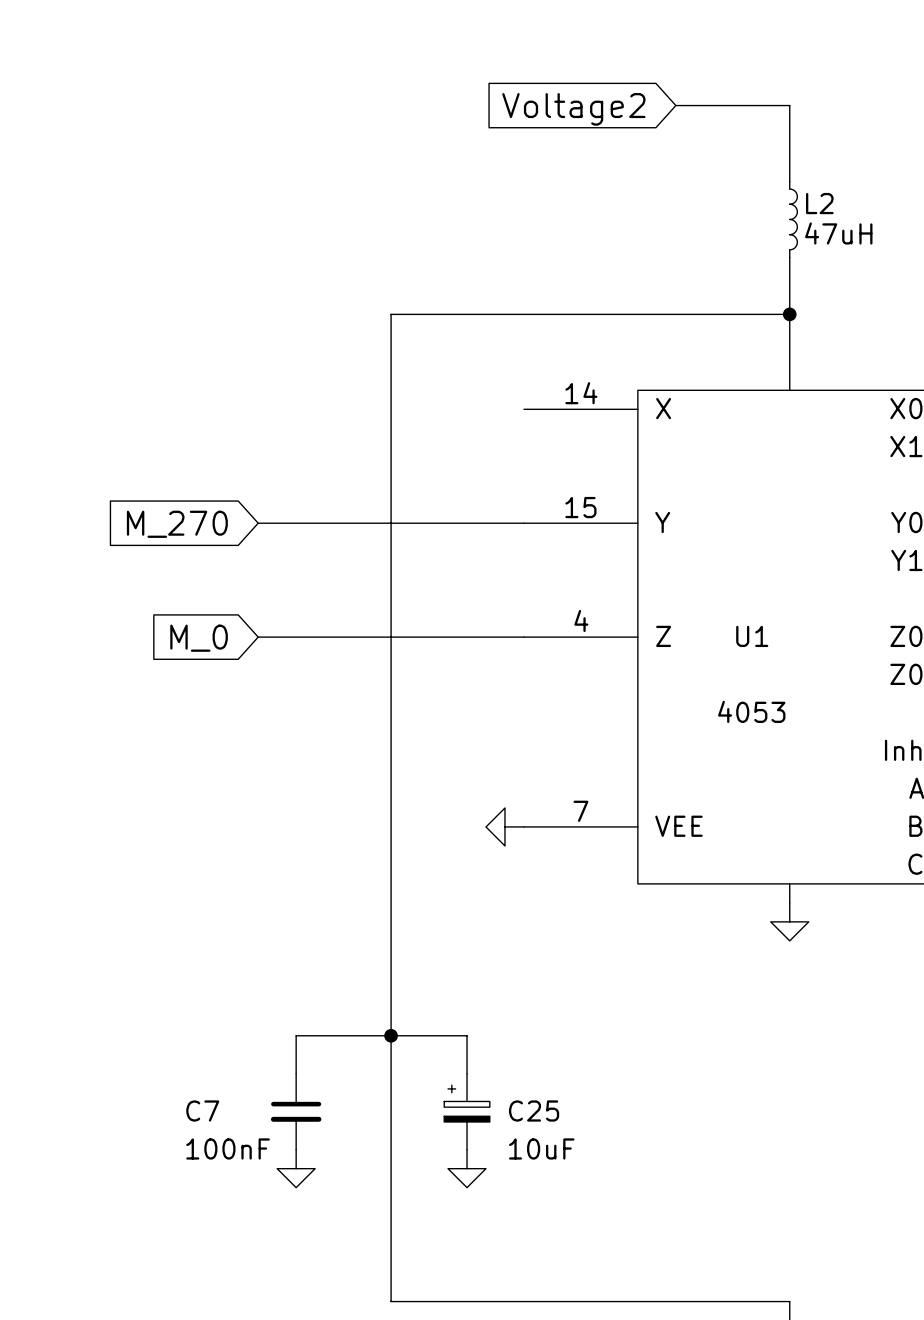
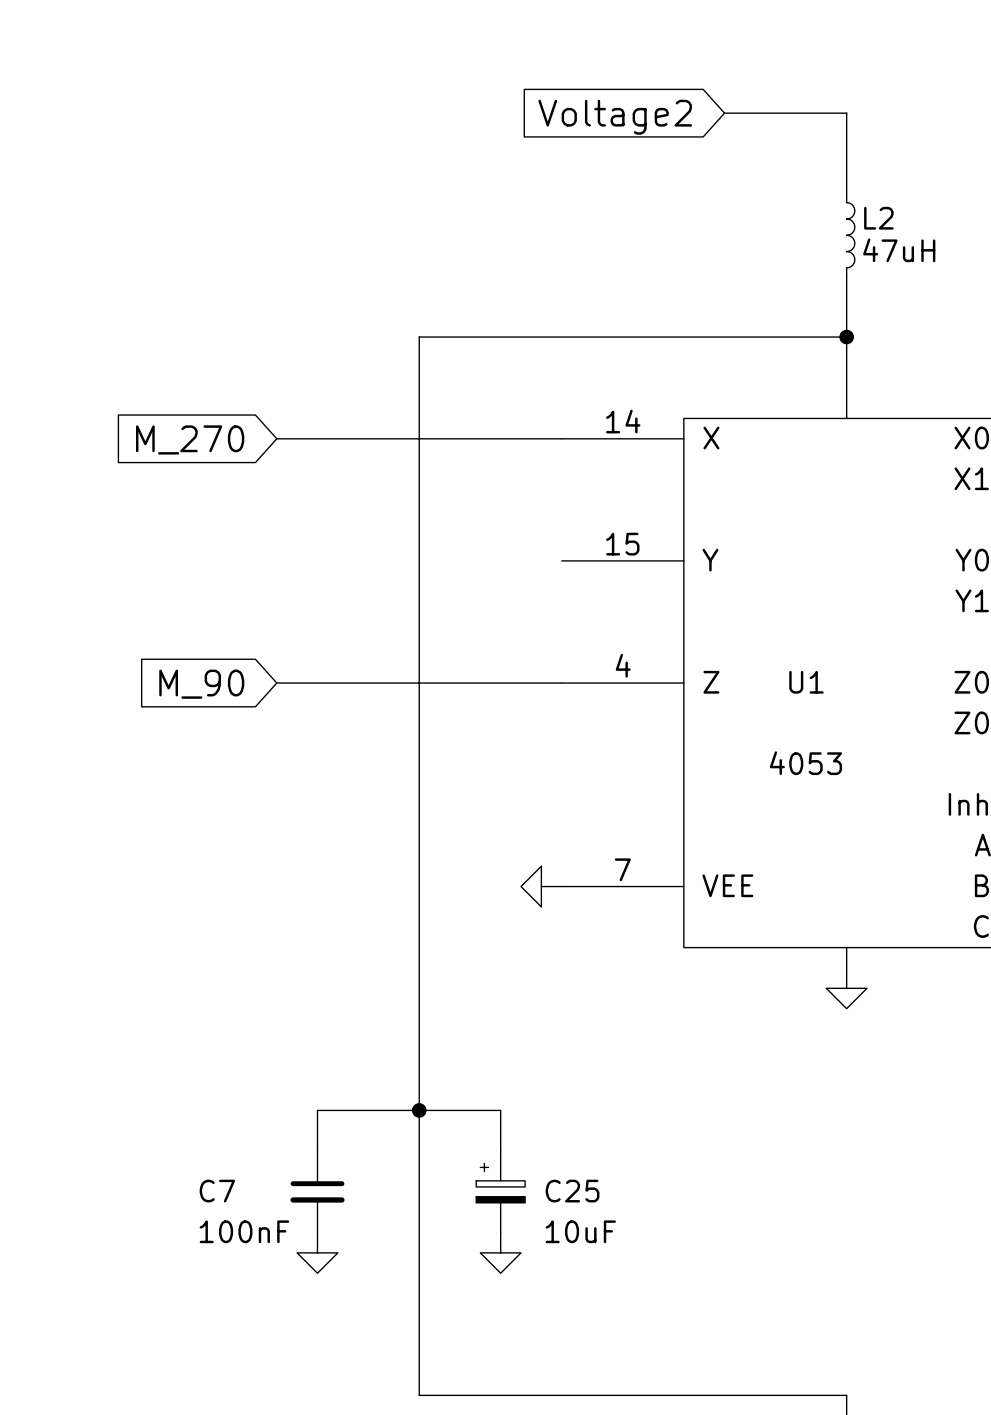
wire: (258, 523) (523, 523) -> (276, 438) (561, 438)
global label position: M_270 (177, 524) -> M_270 (190, 439)
global label: M_0 (199, 638) -> M_90 (201, 684)

